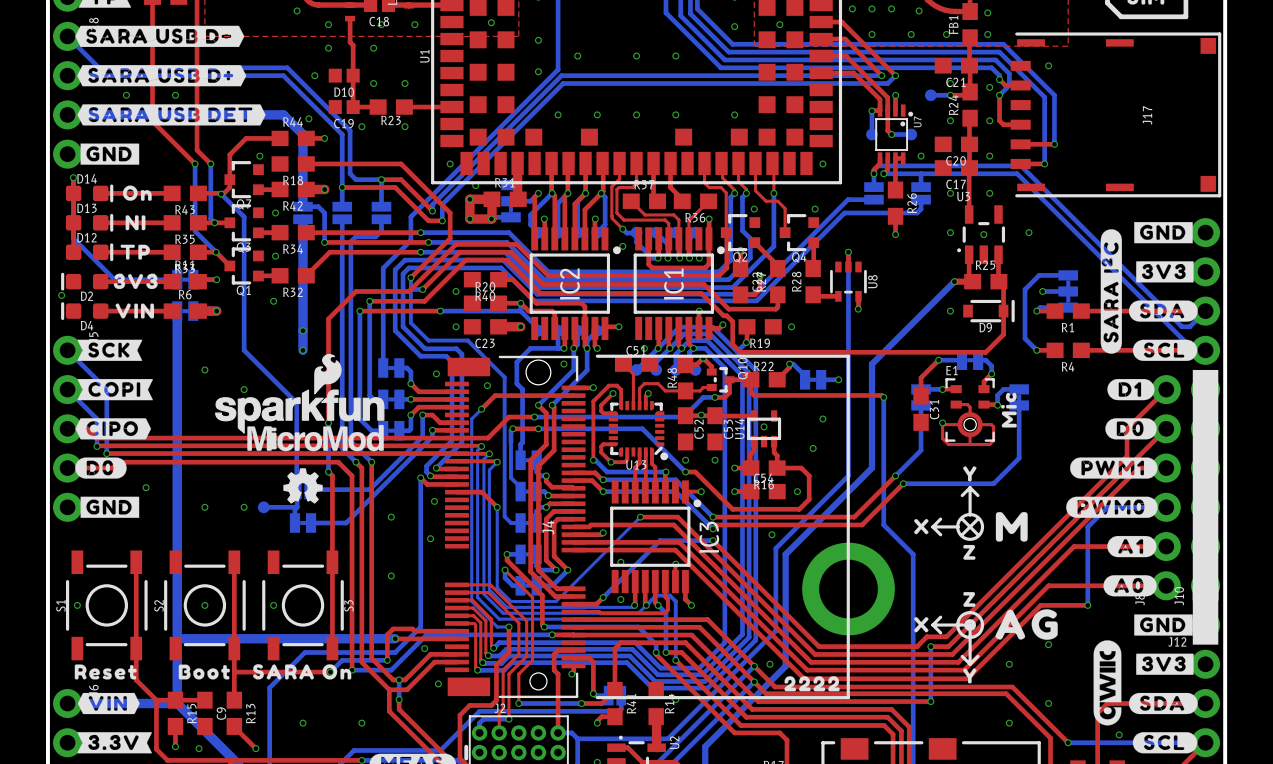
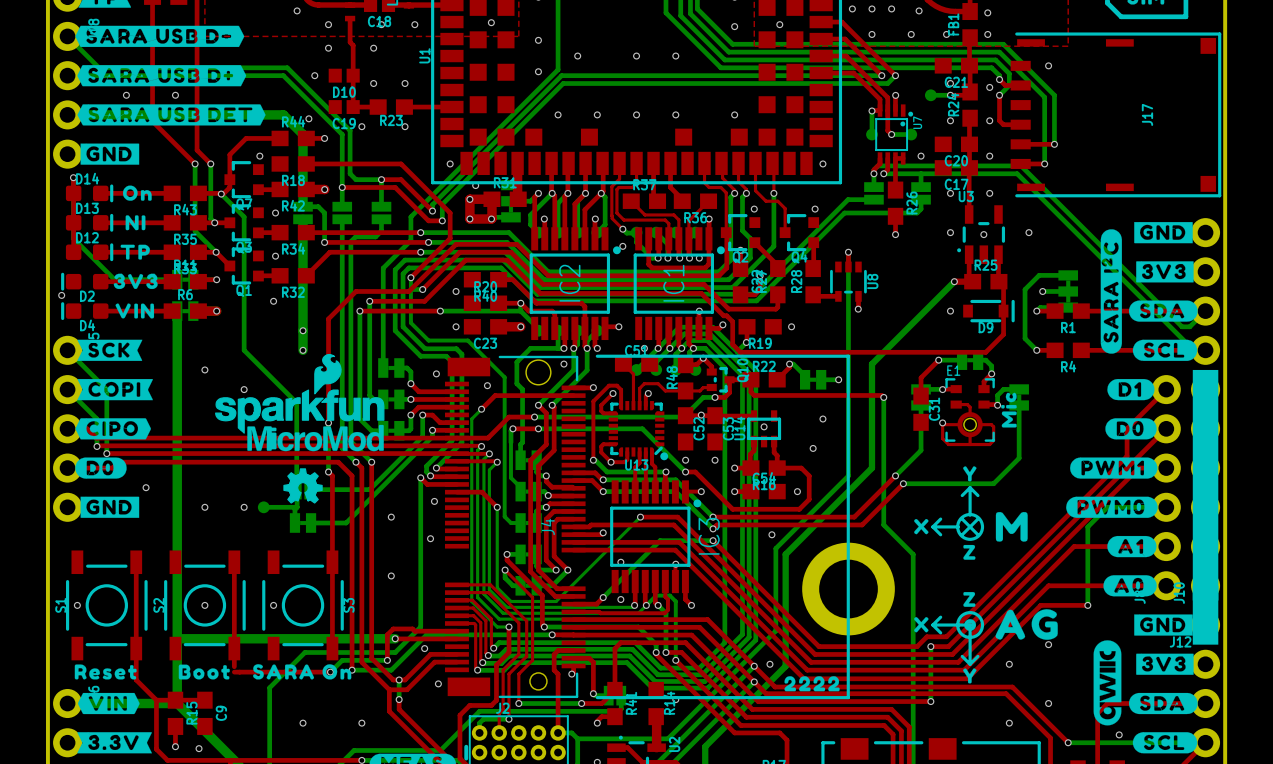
top track: (234, 666) (234, 700) -> none
R13: (234, 713) -> none
top track: (234, 726) (255, 748) -> none
via: (255, 748) -> none

